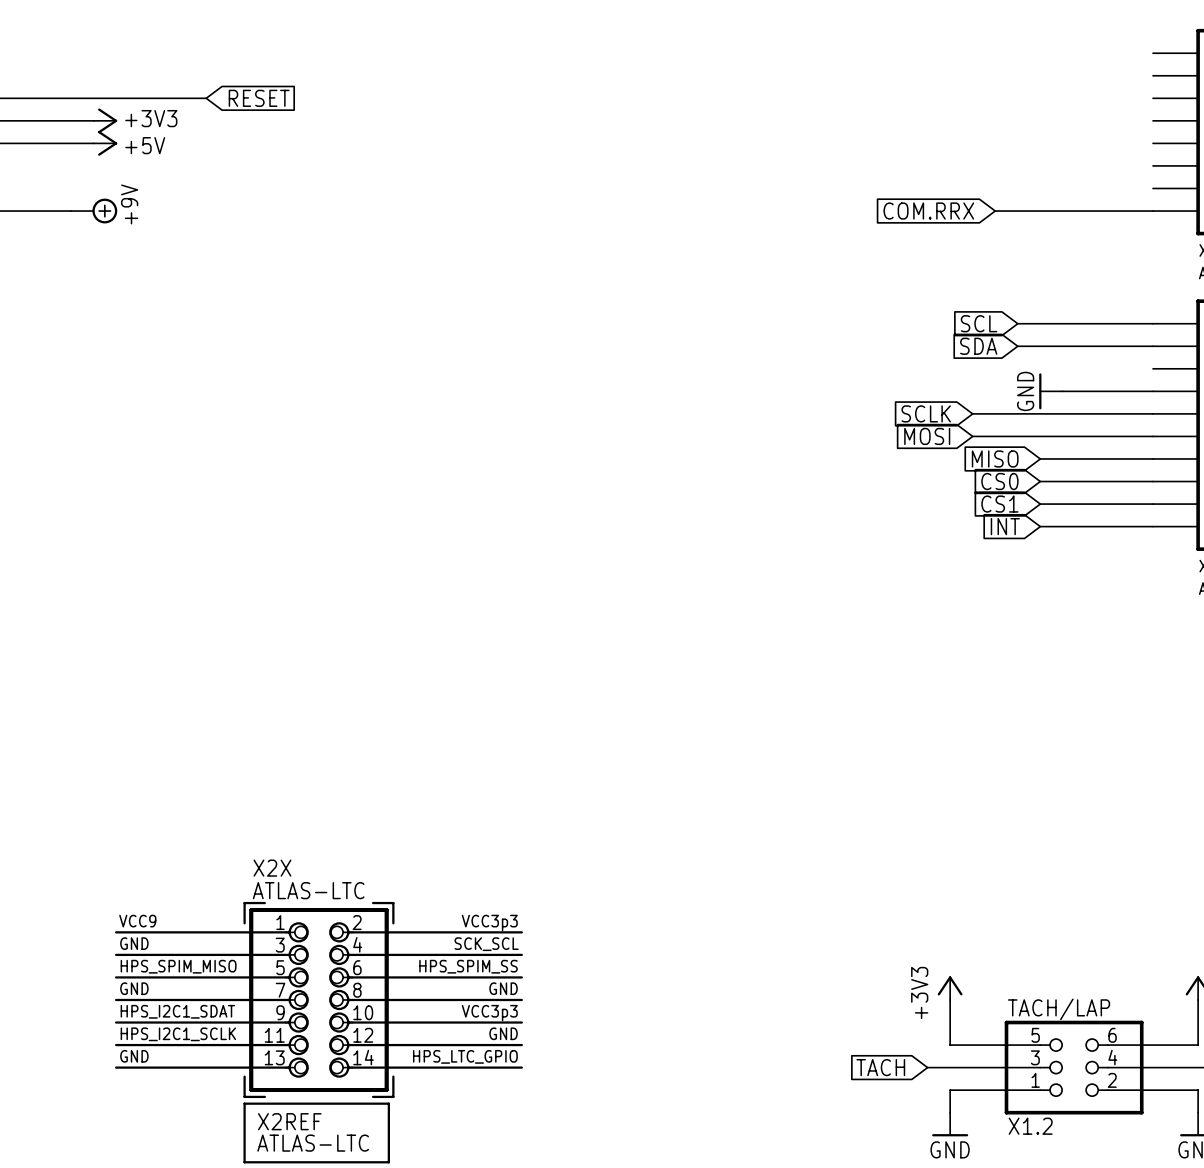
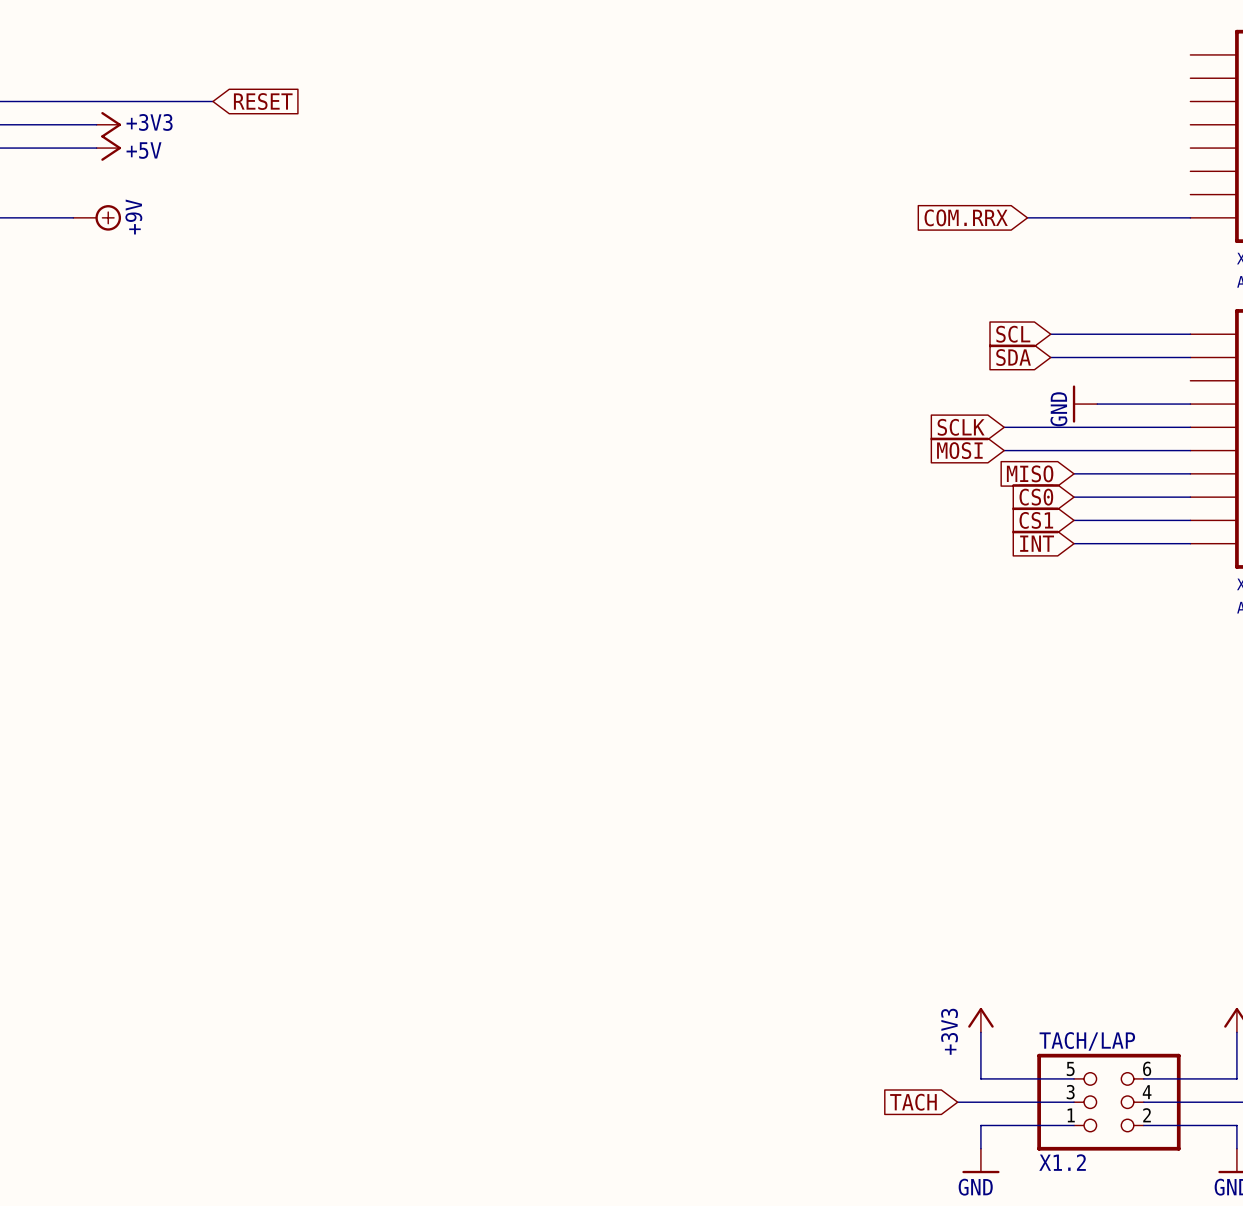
X2X: ATLAS-LTC (318, 999) -> none
X2REF: ATLAS-LTC (318, 1032) -> none

